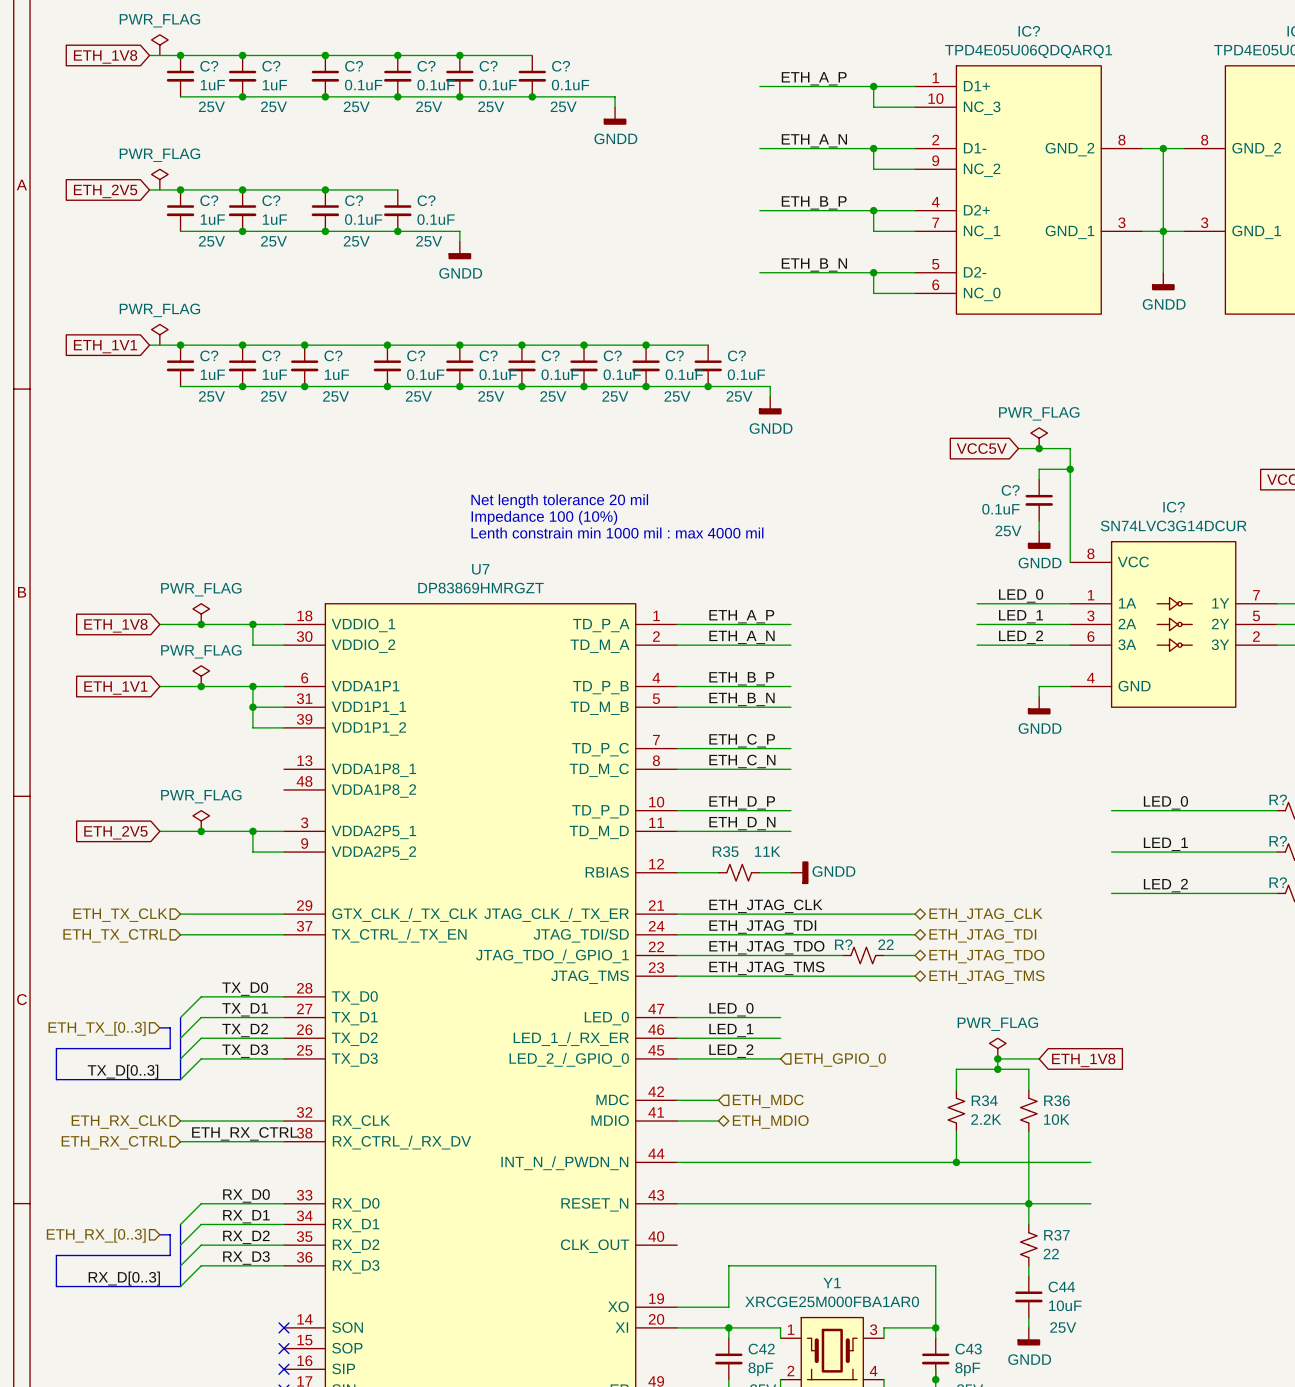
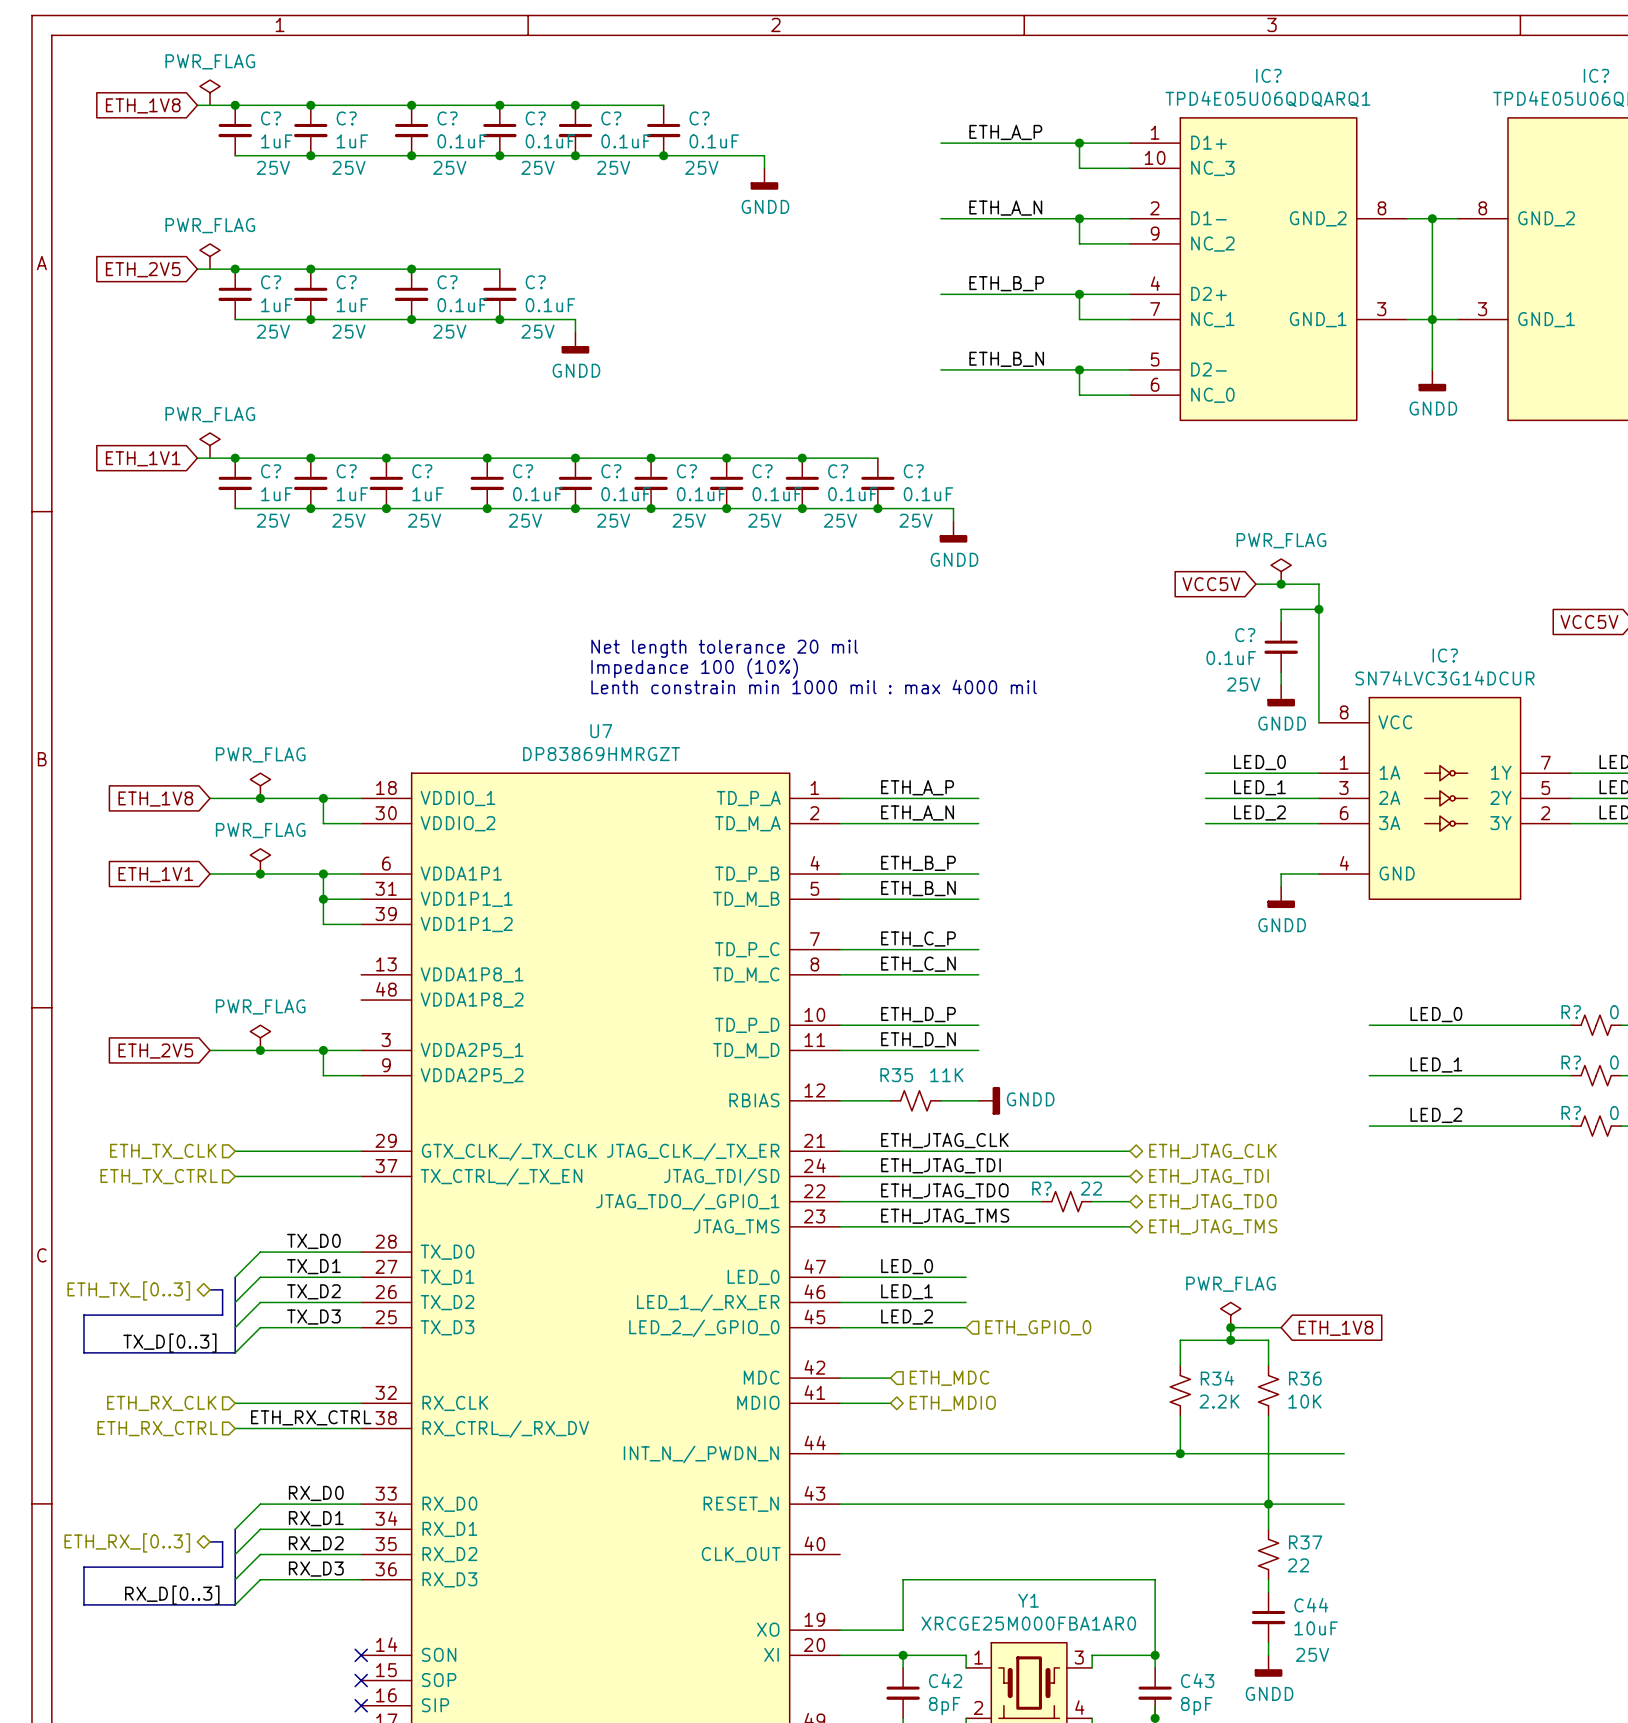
hierarchical label shape: input (97, 1028) -> bidirectional (128, 1290)
hierarchical label shape: input (96, 1235) -> bidirectional (127, 1542)

